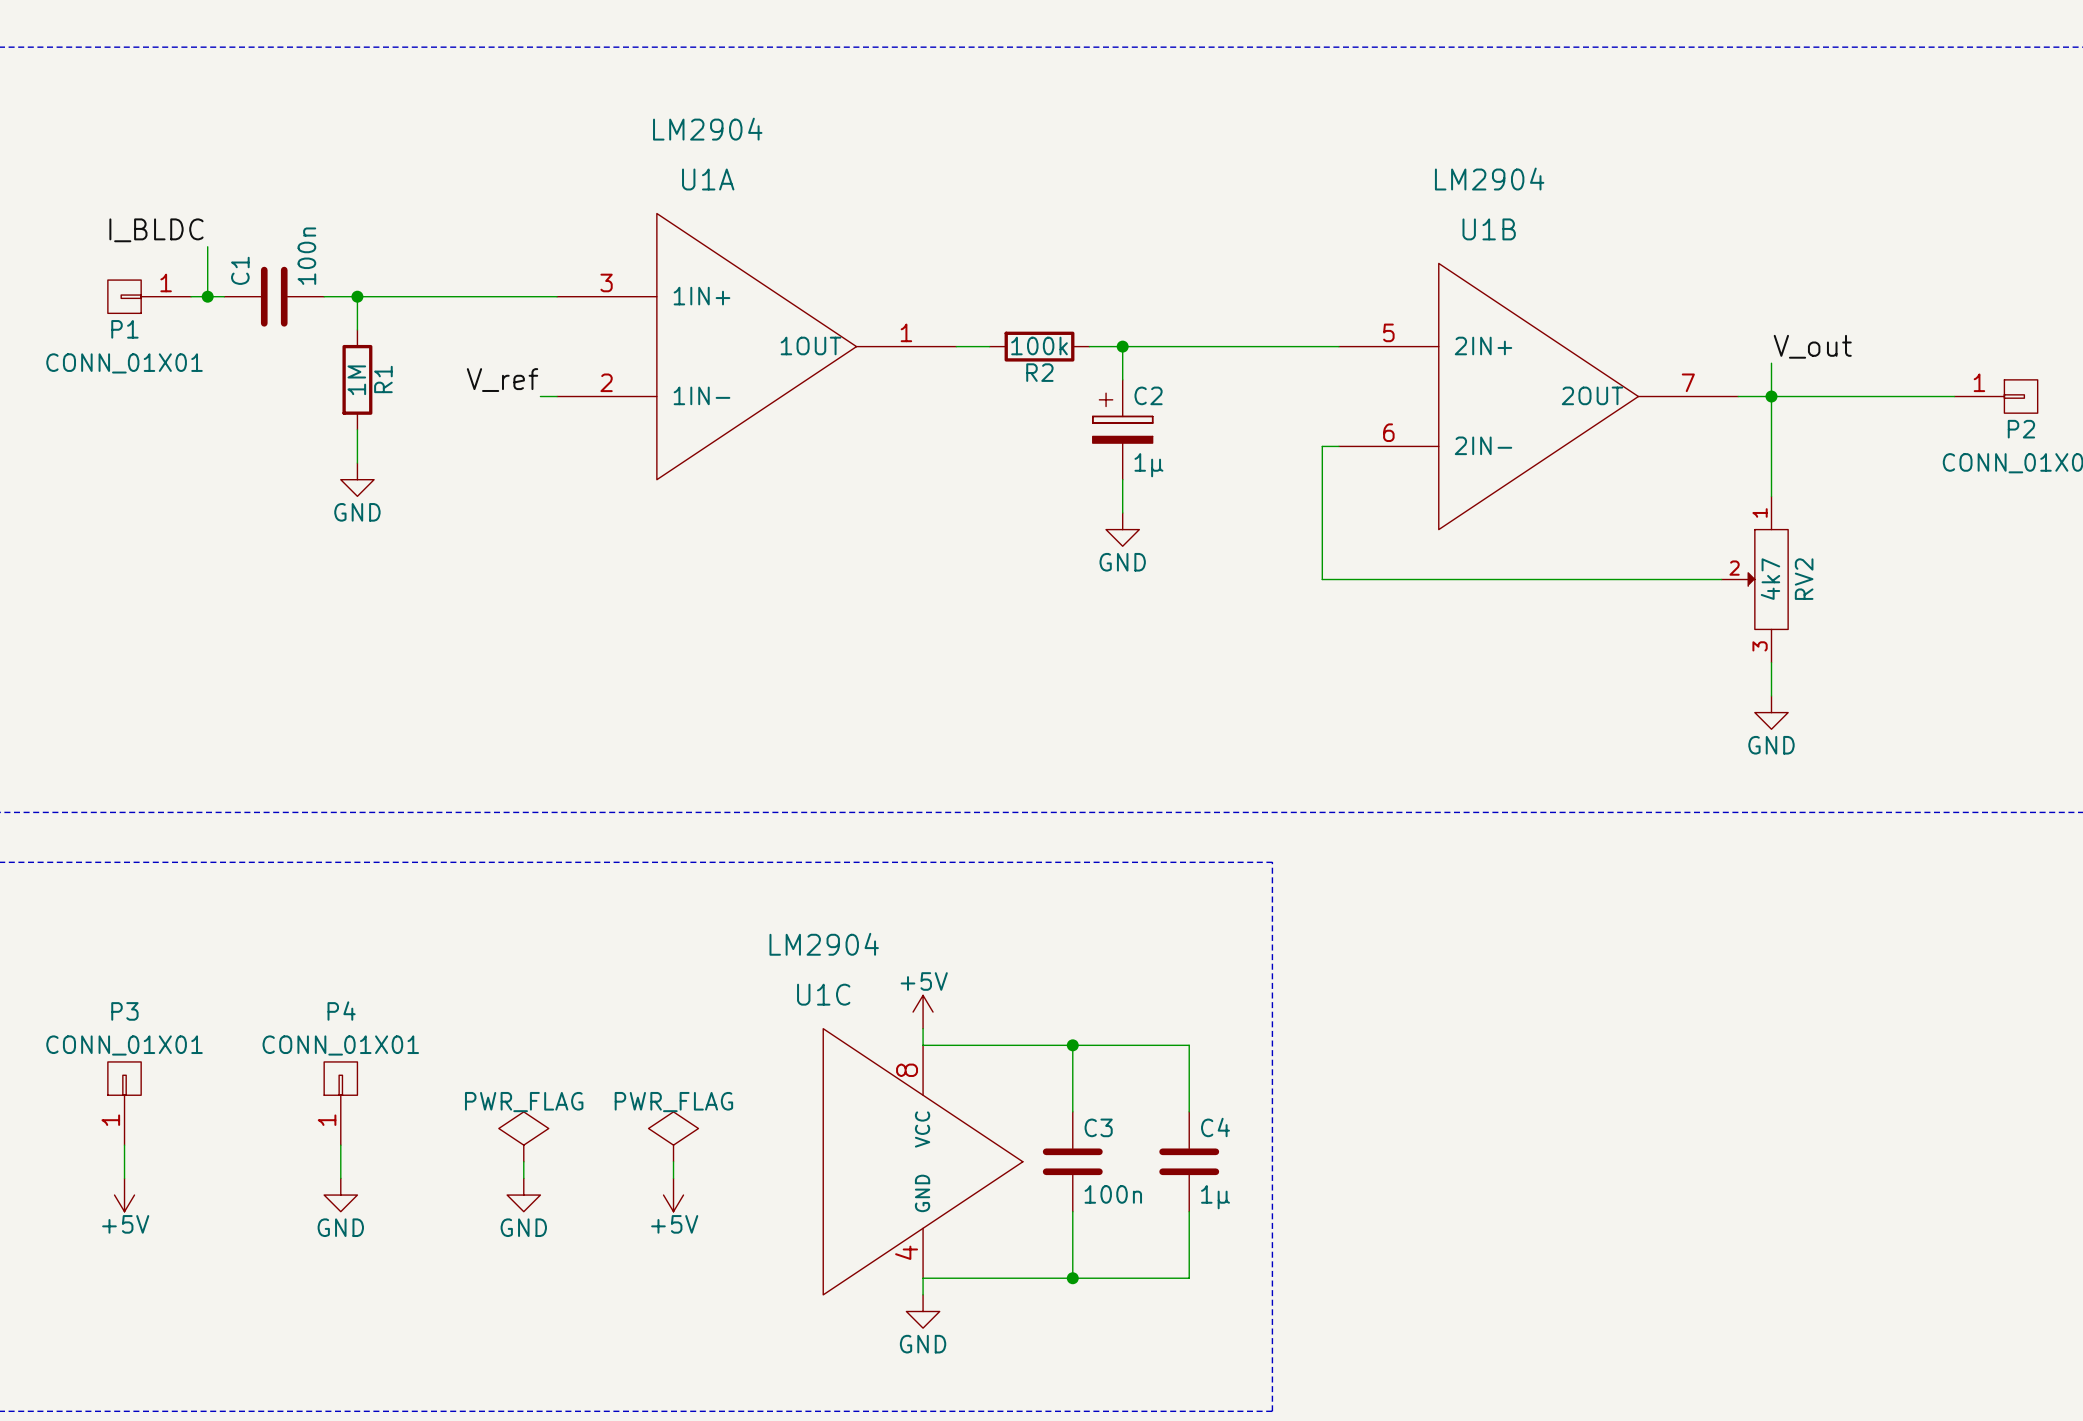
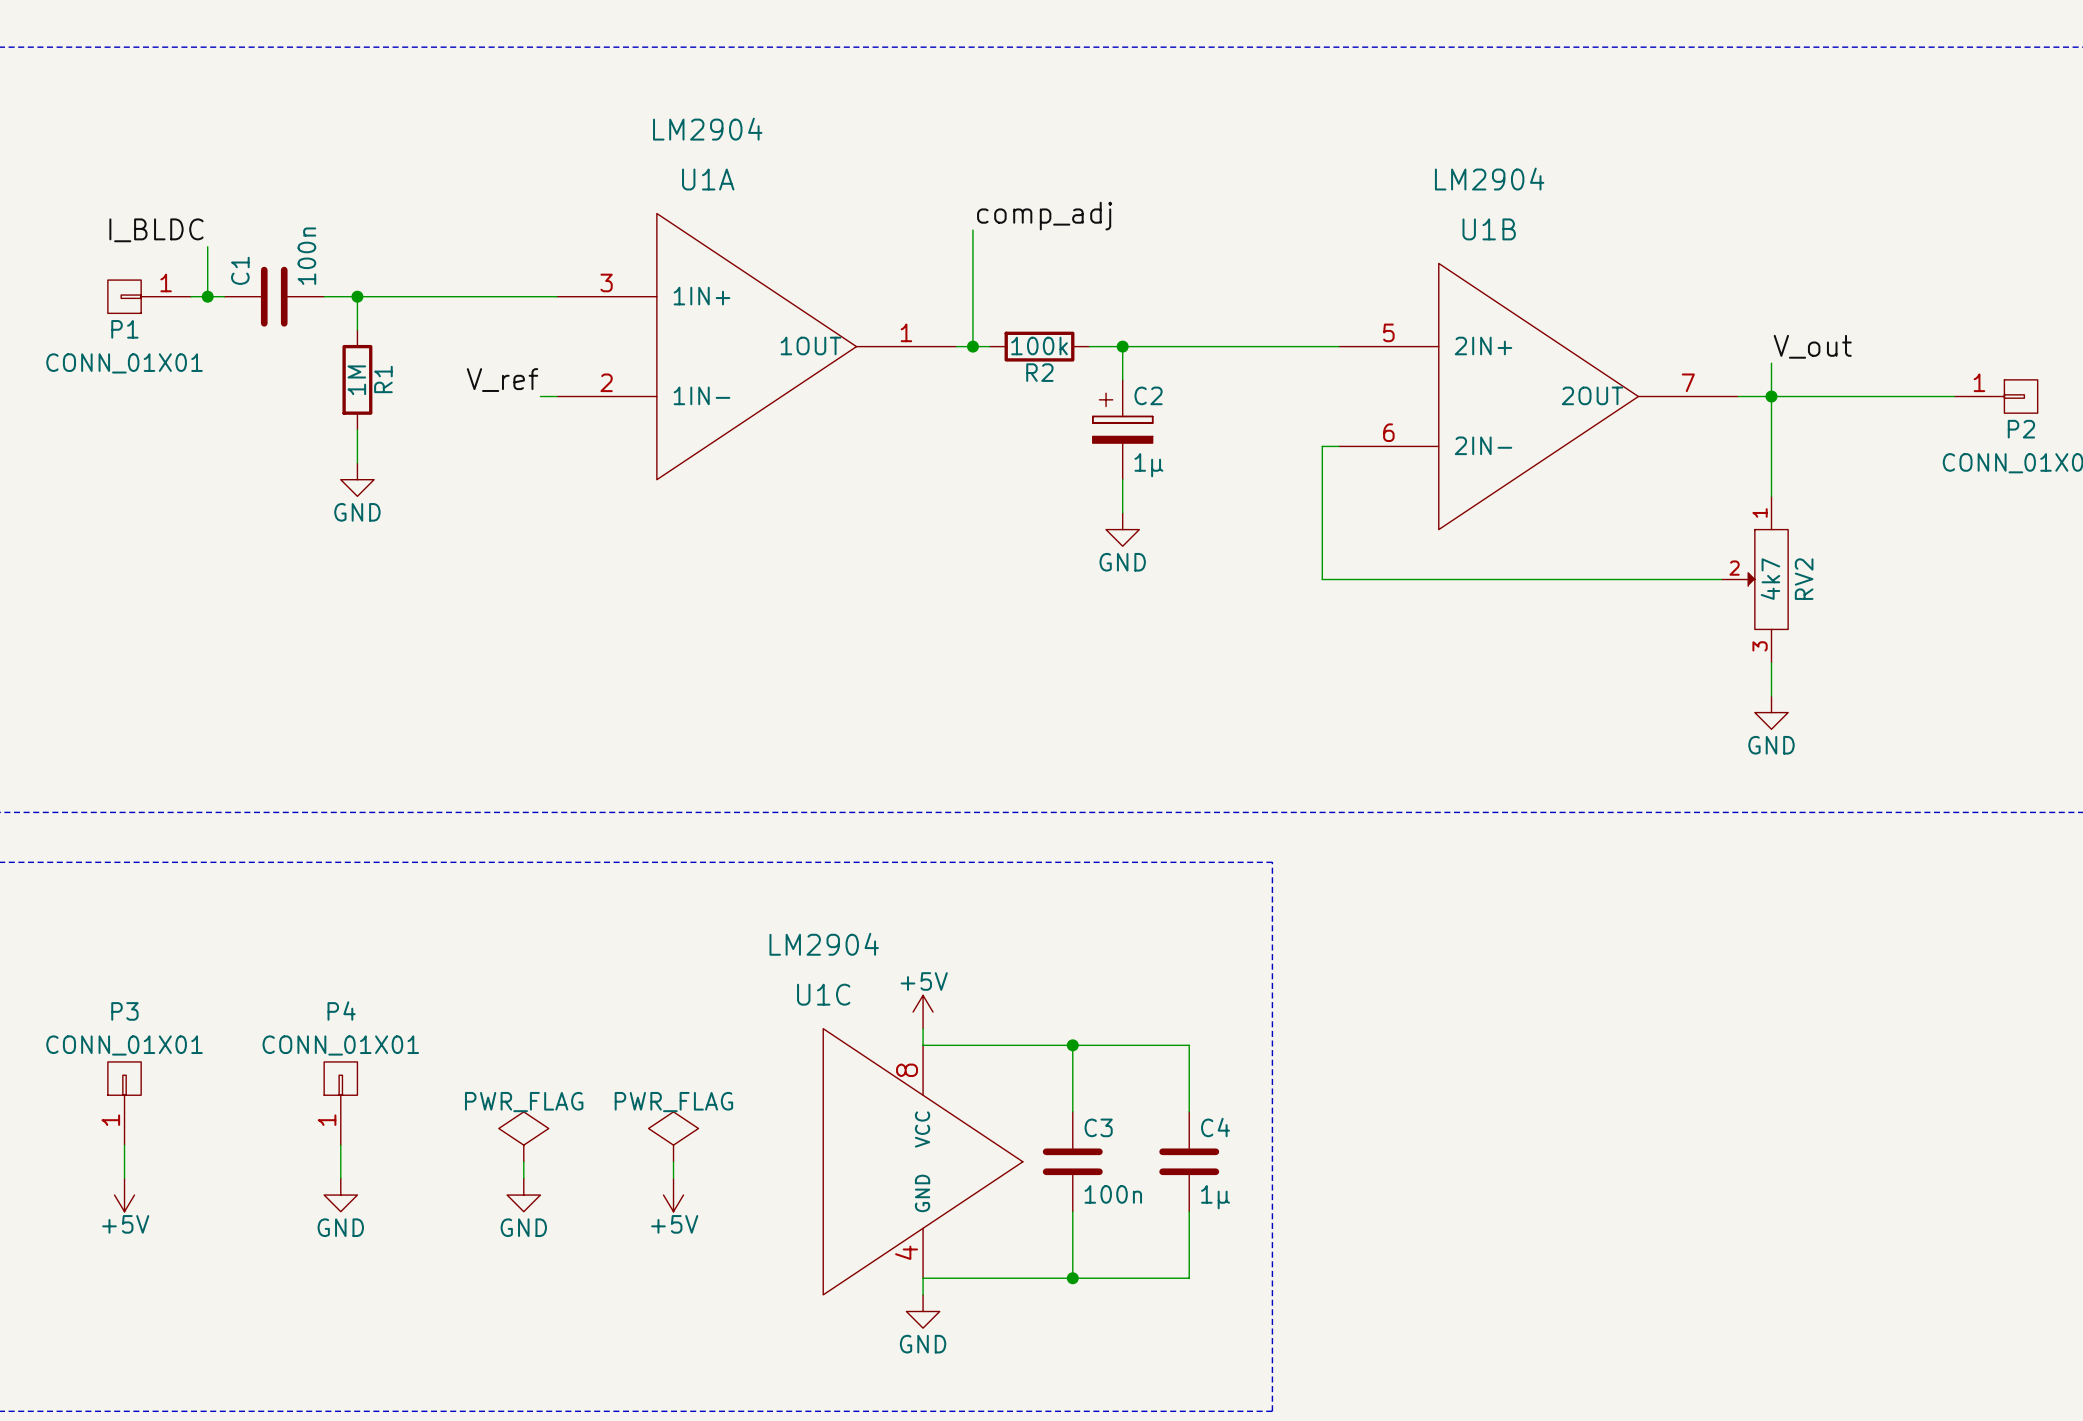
label: none -> comp_adj (1044, 216)
wire: none -> (972, 230) (972, 346)
junction: none -> (972, 346)

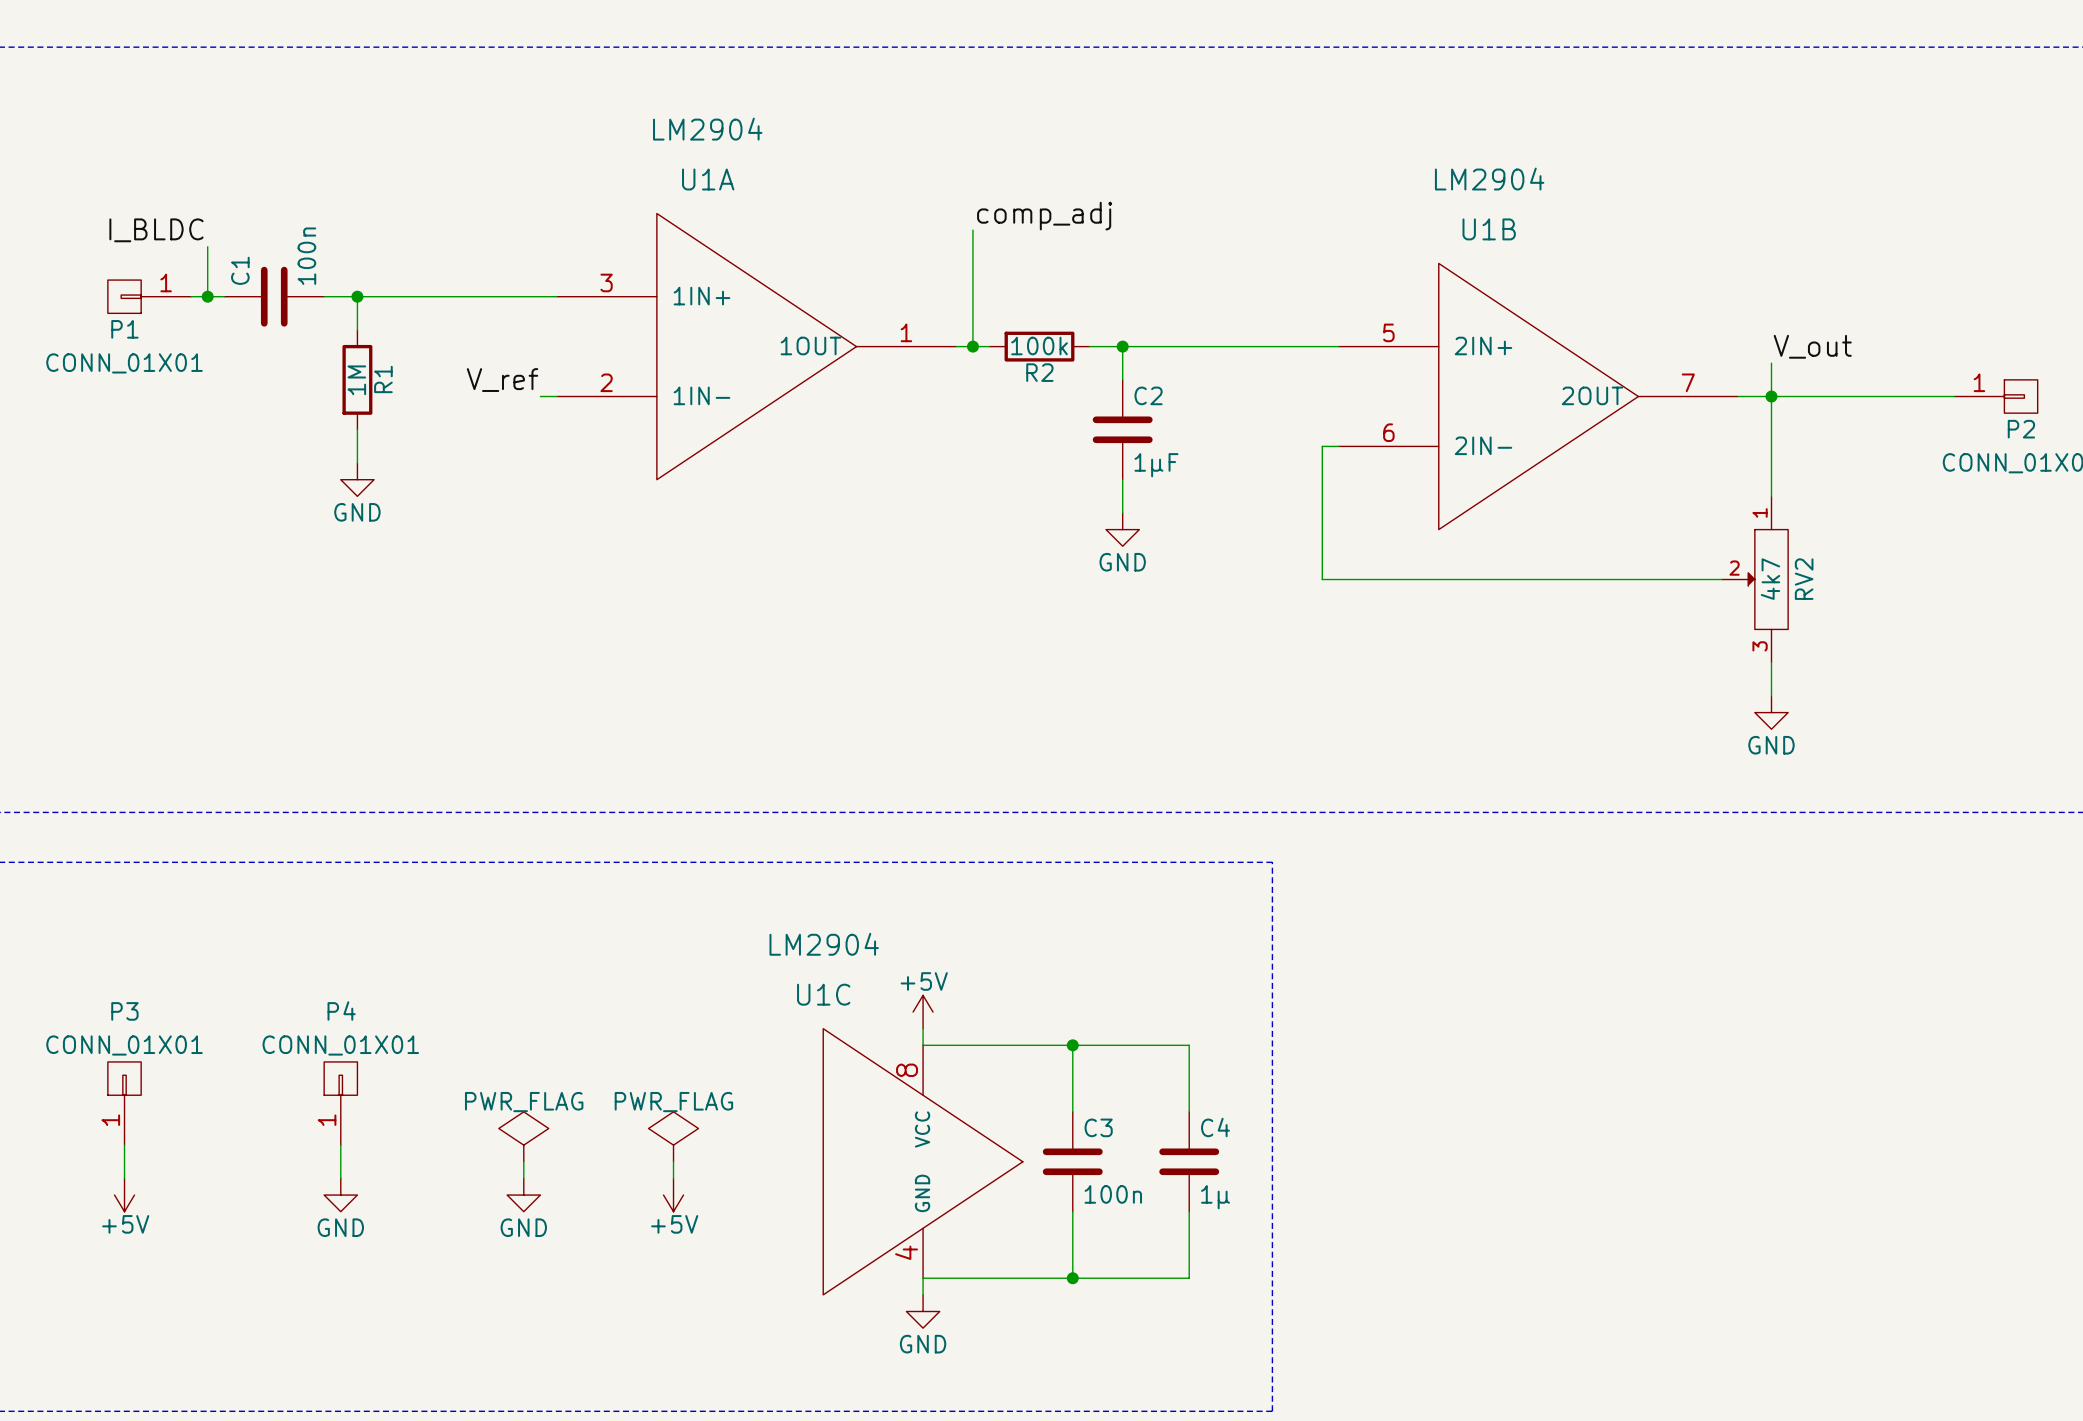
C2 symbol: [1092, 379, 1153, 480] -> [1092, 379, 1153, 480]
C2 value: 1µ (1148, 465) -> 1µF (1156, 465)

